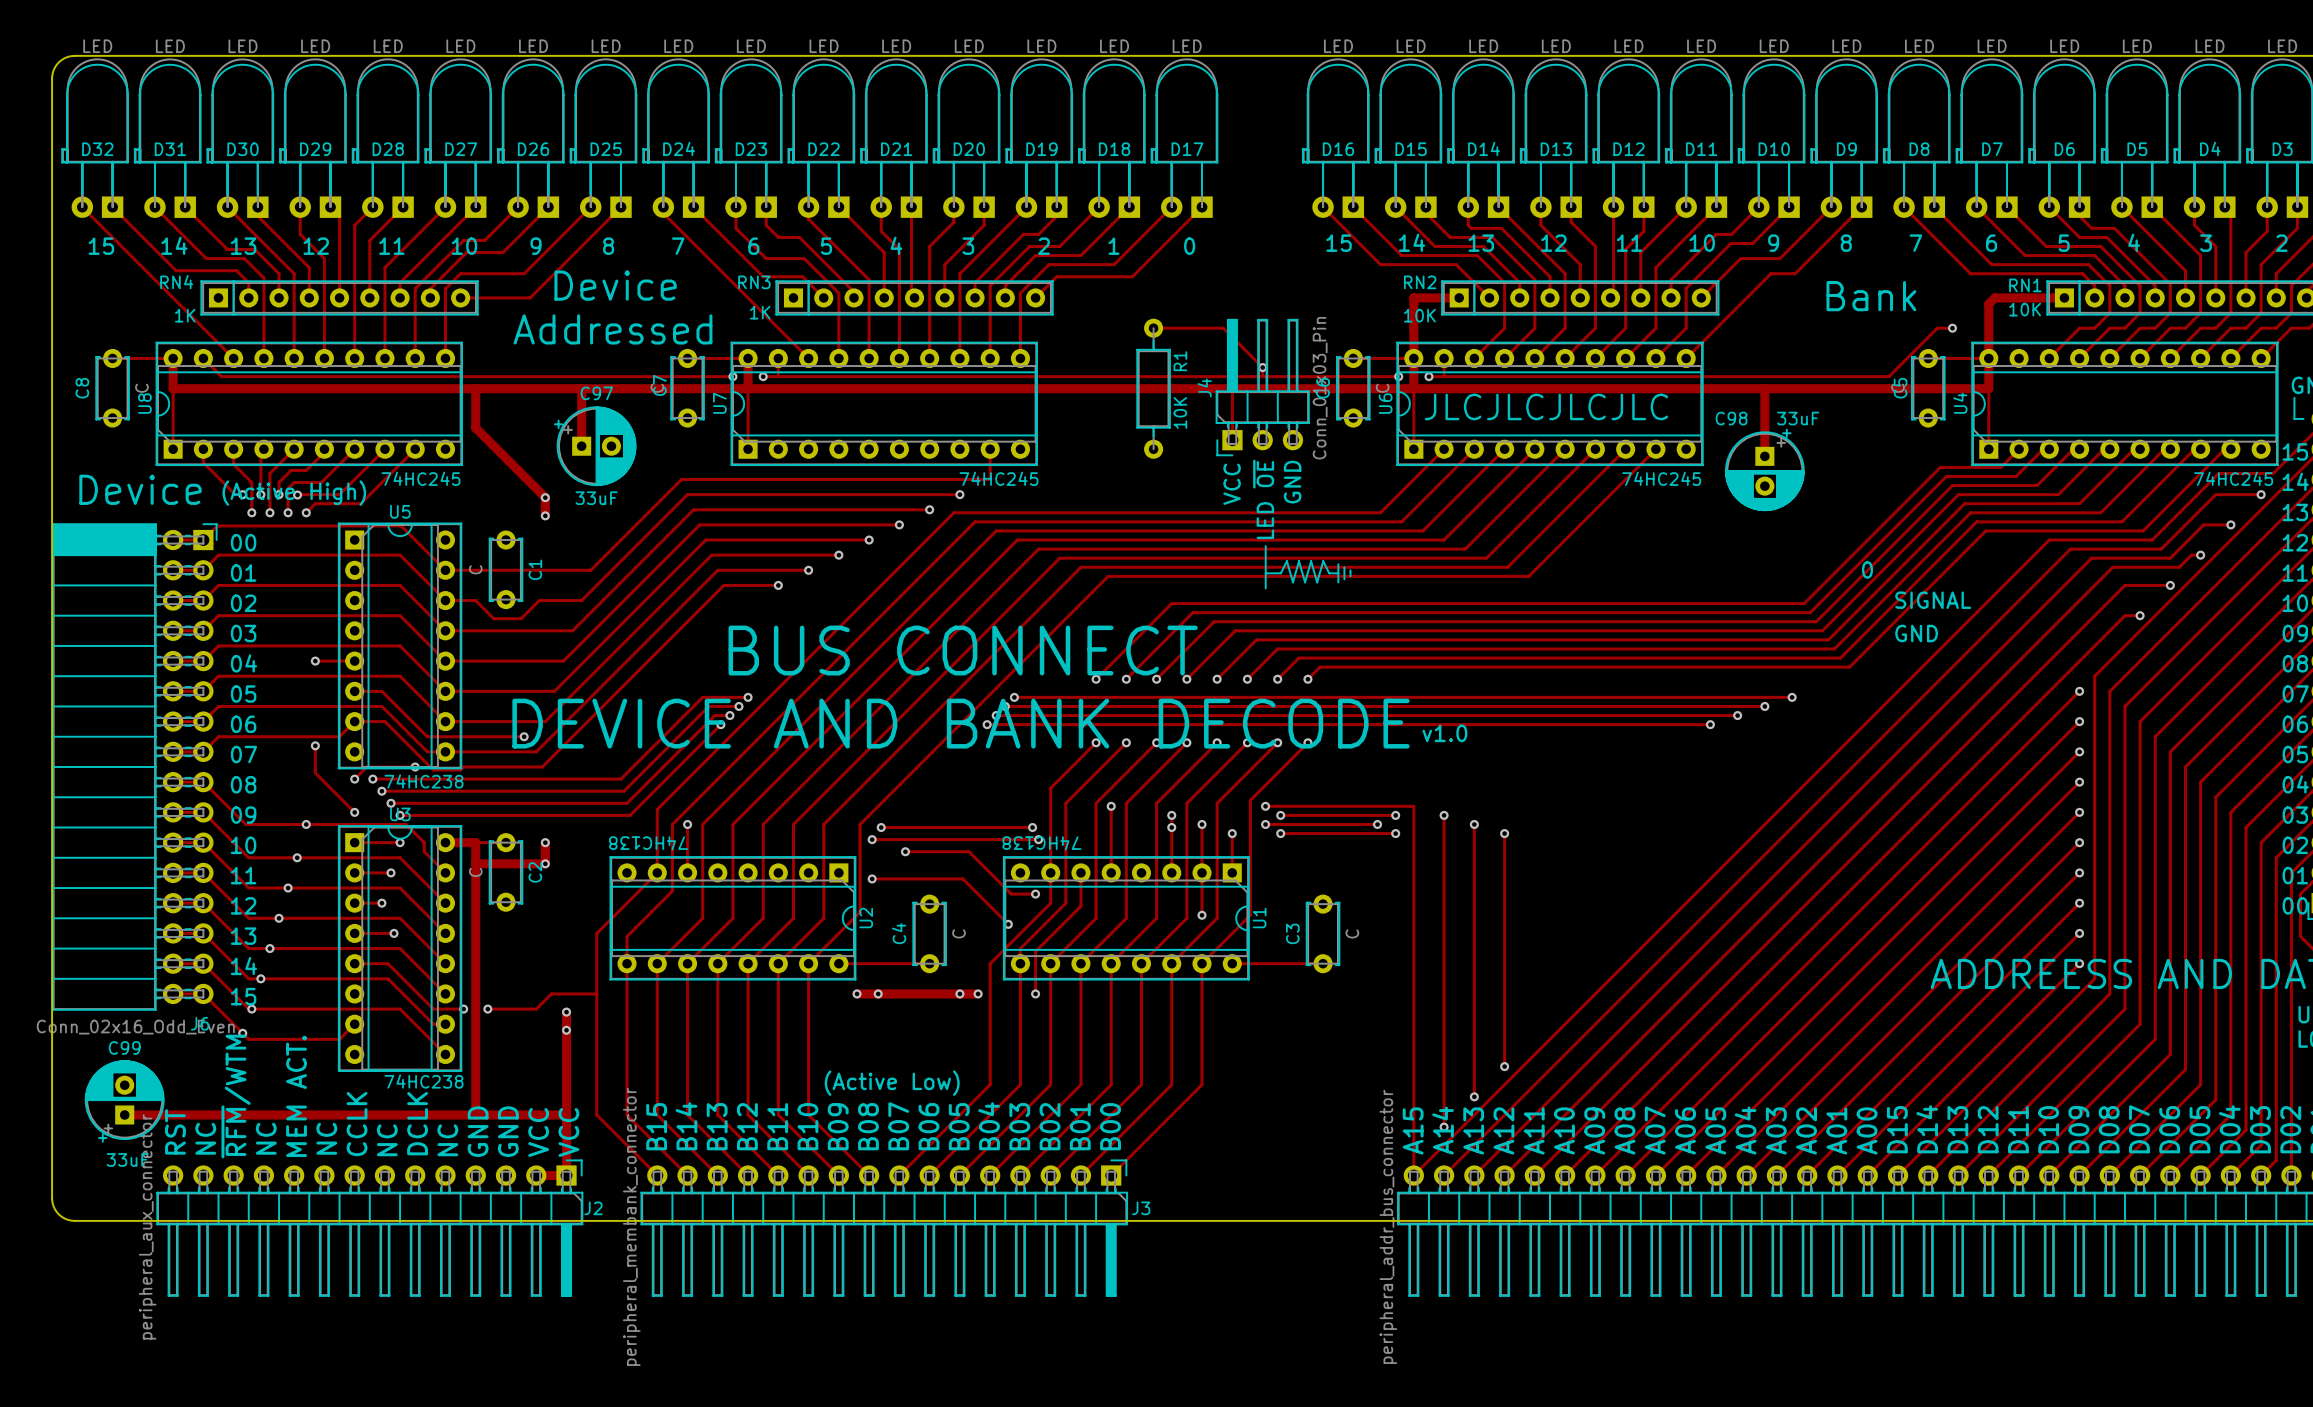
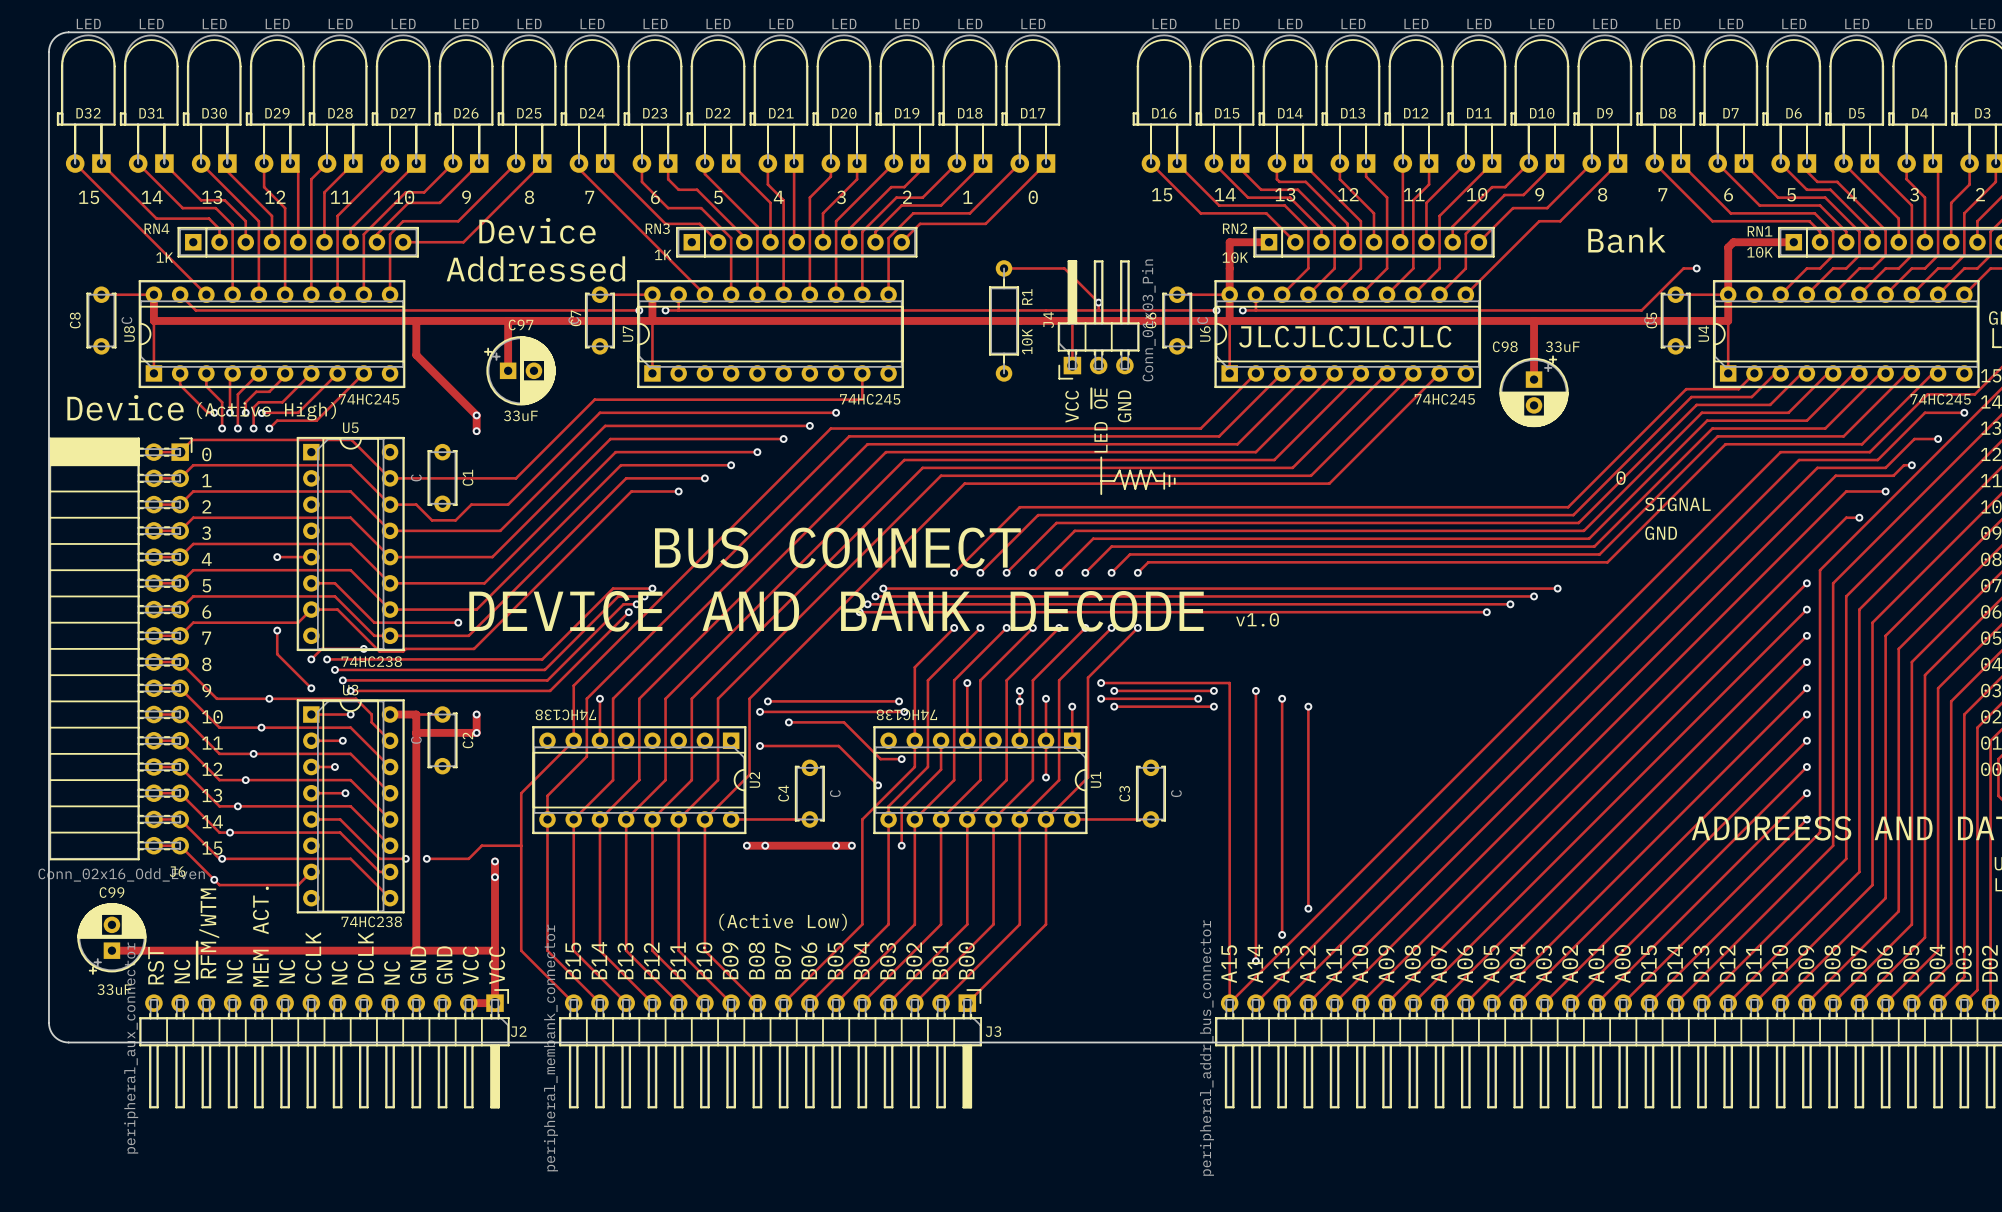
text: 00 (243, 542) -> 0 (206, 454)
text: 01 (243, 572) -> 1 (206, 480)
text: 02 (243, 603) -> 2 (206, 506)
text: 03 (243, 633) -> 3 (206, 533)
text: 04 (243, 663) -> 4 (206, 559)
text: 05 (243, 694) -> 5 (206, 585)
text: 06 (243, 724) -> 6 (206, 612)
text: 07 (243, 754) -> 7 (206, 638)
text: 08 (243, 784) -> 8 (206, 664)
text: 09 (243, 815) -> 9 (206, 690)

